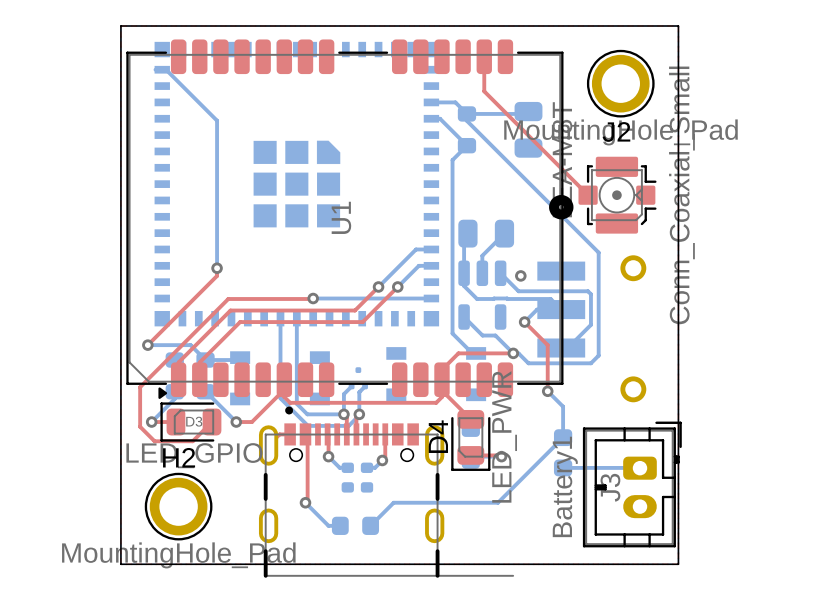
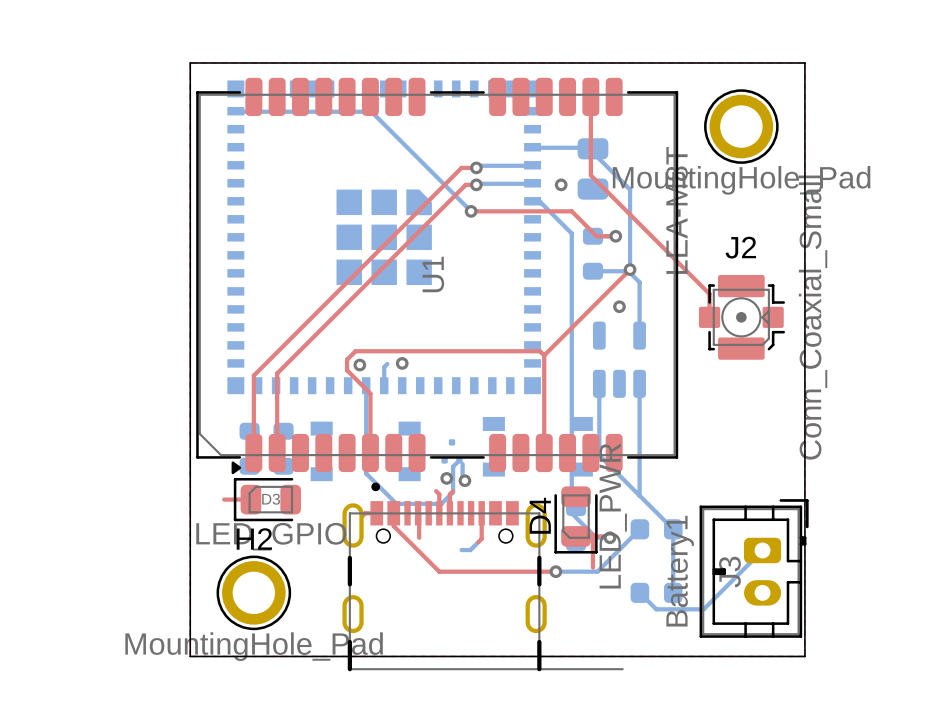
bottom track: (155, 69) (166, 69) (217, 120) (217, 268) -> none
bottom track: none -> (235, 111) (371, 111) (471, 211)
top track: (484, 91) (588, 195) -> (590, 135) (590, 175) (709, 294) (709, 317)
bottom track: (431, 102) (455, 102) (466, 113) -> (532, 147) (588, 147) (630, 189) (630, 269) (628, 271)
bottom track: (528, 111) (526, 113) (466, 113) -> none
bottom track: (466, 113) (466, 120) (598, 252) (598, 355) (590, 363) (528, 363) (518, 353) (513, 353) (495, 335) (482, 335) (464, 317) -> none
bottom track: (431, 118) (440, 118) (466, 145) (452, 160) (452, 333) (472, 353) (476, 353) -> (532, 165) (478, 165) (476, 167)
via: none -> (476, 167)
part position: (466, 129) -> (592, 253)
part position: (528, 129) -> (592, 168)
bottom track: none -> (532, 183) (476, 184)
via: none -> (476, 184)
via: none -> (561, 184)
bottom track: none -> (532, 201) (540, 201) (571, 233) (571, 513) (592, 534)
top track: none -> (471, 211) (571, 211) (596, 236) (615, 236)
via: none -> (471, 211)
via: none -> (615, 236)
J2 position: (617, 195) -> (741, 317)
top track: none -> (630, 269) (544, 355)
via: none -> (630, 269)
bottom track: none -> (592, 271) (628, 271)
bottom track: none -> (628, 271) (639, 282) (639, 335)
bottom track: (467, 233) (464, 237) (464, 286) (477, 298) (550, 298) (561, 309) (537, 309) (524, 322) -> none
part: (486, 233) -> none
bottom track: (504, 233) (482, 255) (482, 273) -> none
bottom track: (431, 249) (416, 249) (378, 286) -> none
bottom track: (431, 265) (418, 265) (397, 286) -> none
top track: (217, 268) (217, 275) (147, 345) -> none
via: (217, 268) -> none
bottom track: (500, 273) (518, 291) (587, 291) (590, 294) (590, 324) (567, 348) (561, 348) -> none
via position: (520, 275) -> (619, 306)
top track: (378, 286) (354, 310) (230, 310) (178, 362) -> (476, 167) (461, 167) (253, 375) (253, 433)
via: (378, 286) -> none
top track: (397, 286) (362, 322) (240, 322) (199, 362) -> (476, 184) (465, 184) (277, 373) (277, 433)
via: (397, 286) -> none
part rotation: 0° (482, 295) -> 180° (619, 359)
top track: (313, 298) (228, 298) (140, 387) (140, 426) (154, 441) (192, 441) (212, 422) -> none
bottom track: (313, 298) (431, 298) -> none
part: (591, 298) -> none
via: none -> (359, 365)
bottom track: none -> (599, 383) (599, 455) (673, 529) (673, 592)
bottom track: none -> (639, 383) (639, 495)
bottom track: (296, 319) (296, 403) (307, 414) (343, 414) (343, 394) (351, 386) -> (384, 385) (384, 367) (387, 363)
top track: (524, 322) (547, 345) (547, 391) -> none
via: (524, 322) -> none
bottom track: (147, 345) (190, 345) (205, 360) (237, 360) (240, 357) -> none
via: (147, 345) -> none
top track: (513, 353) (458, 353) (441, 369) -> (544, 355) (544, 442)
via: (513, 353) -> none
top track: (284, 379) (284, 397) (290, 402) (436, 402) (441, 397) (441, 379) -> (370, 452) (370, 393) (347, 370) (347, 359) (355, 351) (539, 351) (544, 355)
top track: (284, 389) (251, 422) (236, 422) -> none
bottom track: none -> (462, 464) (462, 478) (464, 480)
top track: (441, 390) (470, 419) -> none
bottom track: (174, 391) (174, 398) (151, 422) -> none
bottom track: (205, 391) (236, 422) -> none
bottom track: (547, 391) (563, 406) (563, 437) (497, 502) (393, 502) (370, 525) -> none
via: (547, 391) -> none
via: none -> (446, 478)
via: (343, 414) -> none
via position: (359, 414) -> (464, 480)
via: (151, 422) -> none
via: (236, 422) -> none
top track: (305, 434) (307, 436) (307, 500) (305, 502) -> (393, 513) (393, 526) (439, 571) (555, 571)
bottom track: none -> (639, 529) (597, 571) (555, 571)
part rotation: 0° (563, 452) -> 90° clockwise (656, 529)
top track: none -> (592, 534) (592, 567)
bottom track: (328, 456) (339, 467) (347, 467) -> none
via: (328, 456) -> none
via: (382, 460) -> none
bottom track: (563, 467) (639, 467) -> (639, 592) (656, 609) (703, 609) (762, 550)
part: (347, 477) -> none
part: (367, 477) -> none
via: none -> (555, 571)
bottom track: (305, 502) (328, 525) (340, 525) -> none
via: (305, 502) -> none
part: none -> (656, 592)
part: (355, 525) -> none

